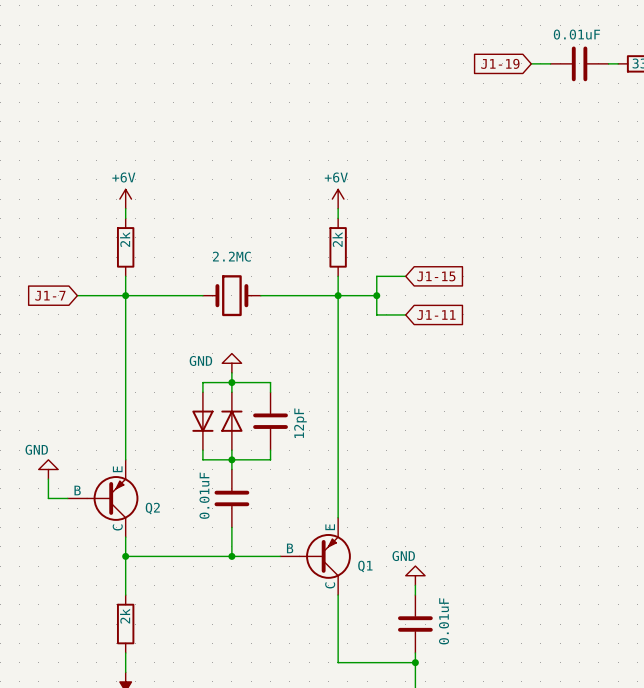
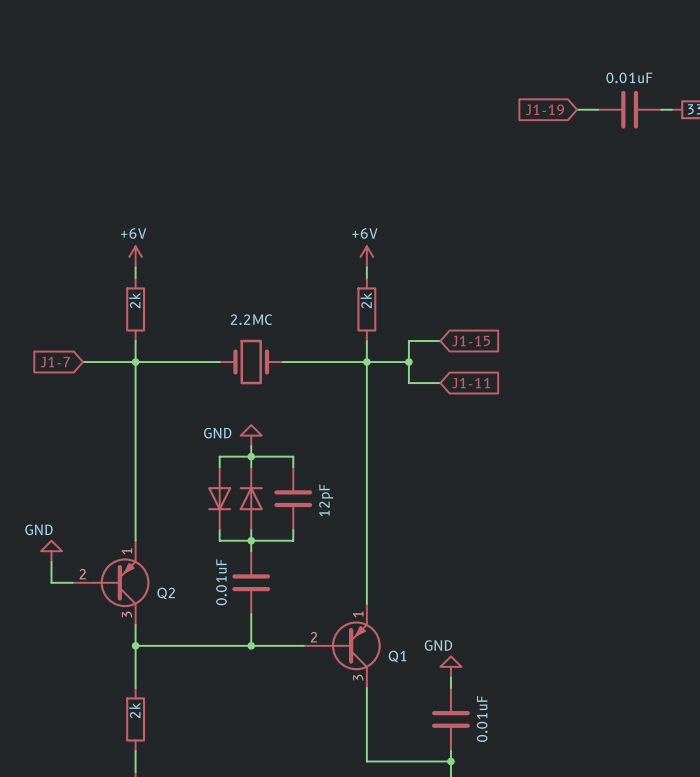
Q2 symbol: [67, 459, 139, 538] -> [72, 540, 150, 625]
Q1 symbol: [280, 517, 351, 596] -> [303, 603, 381, 688]

